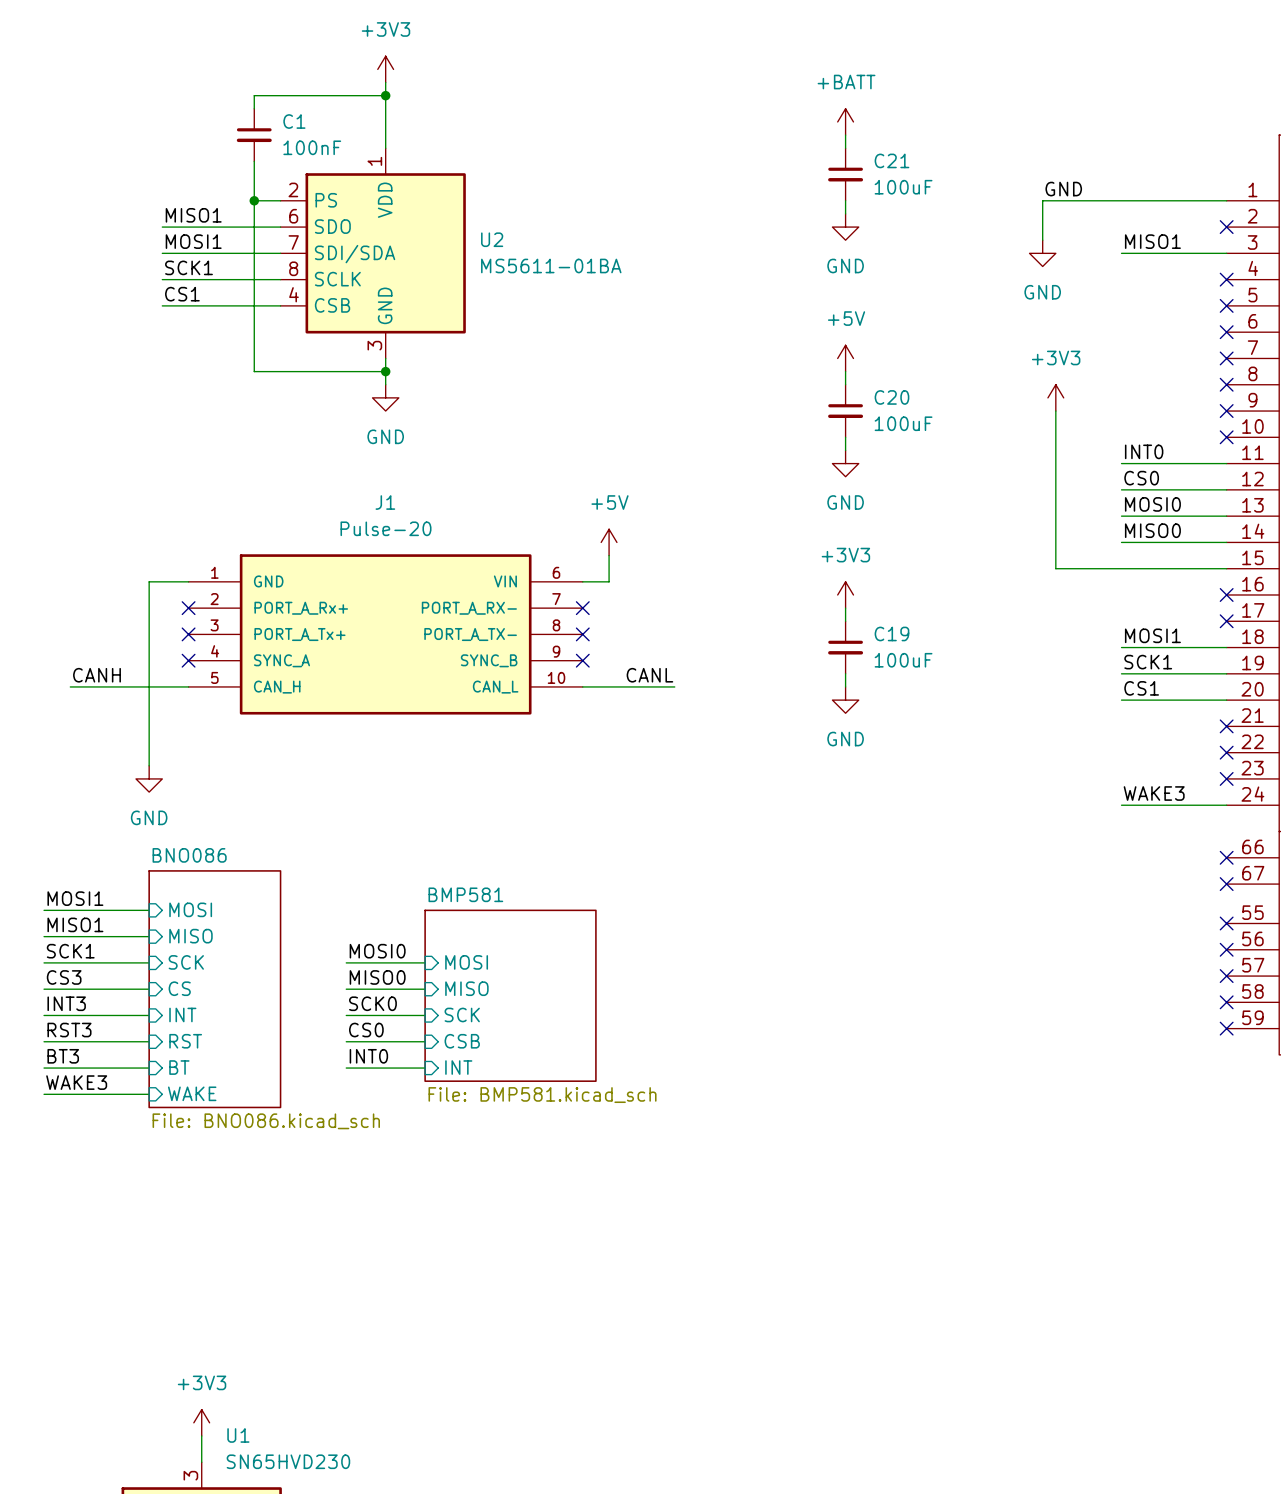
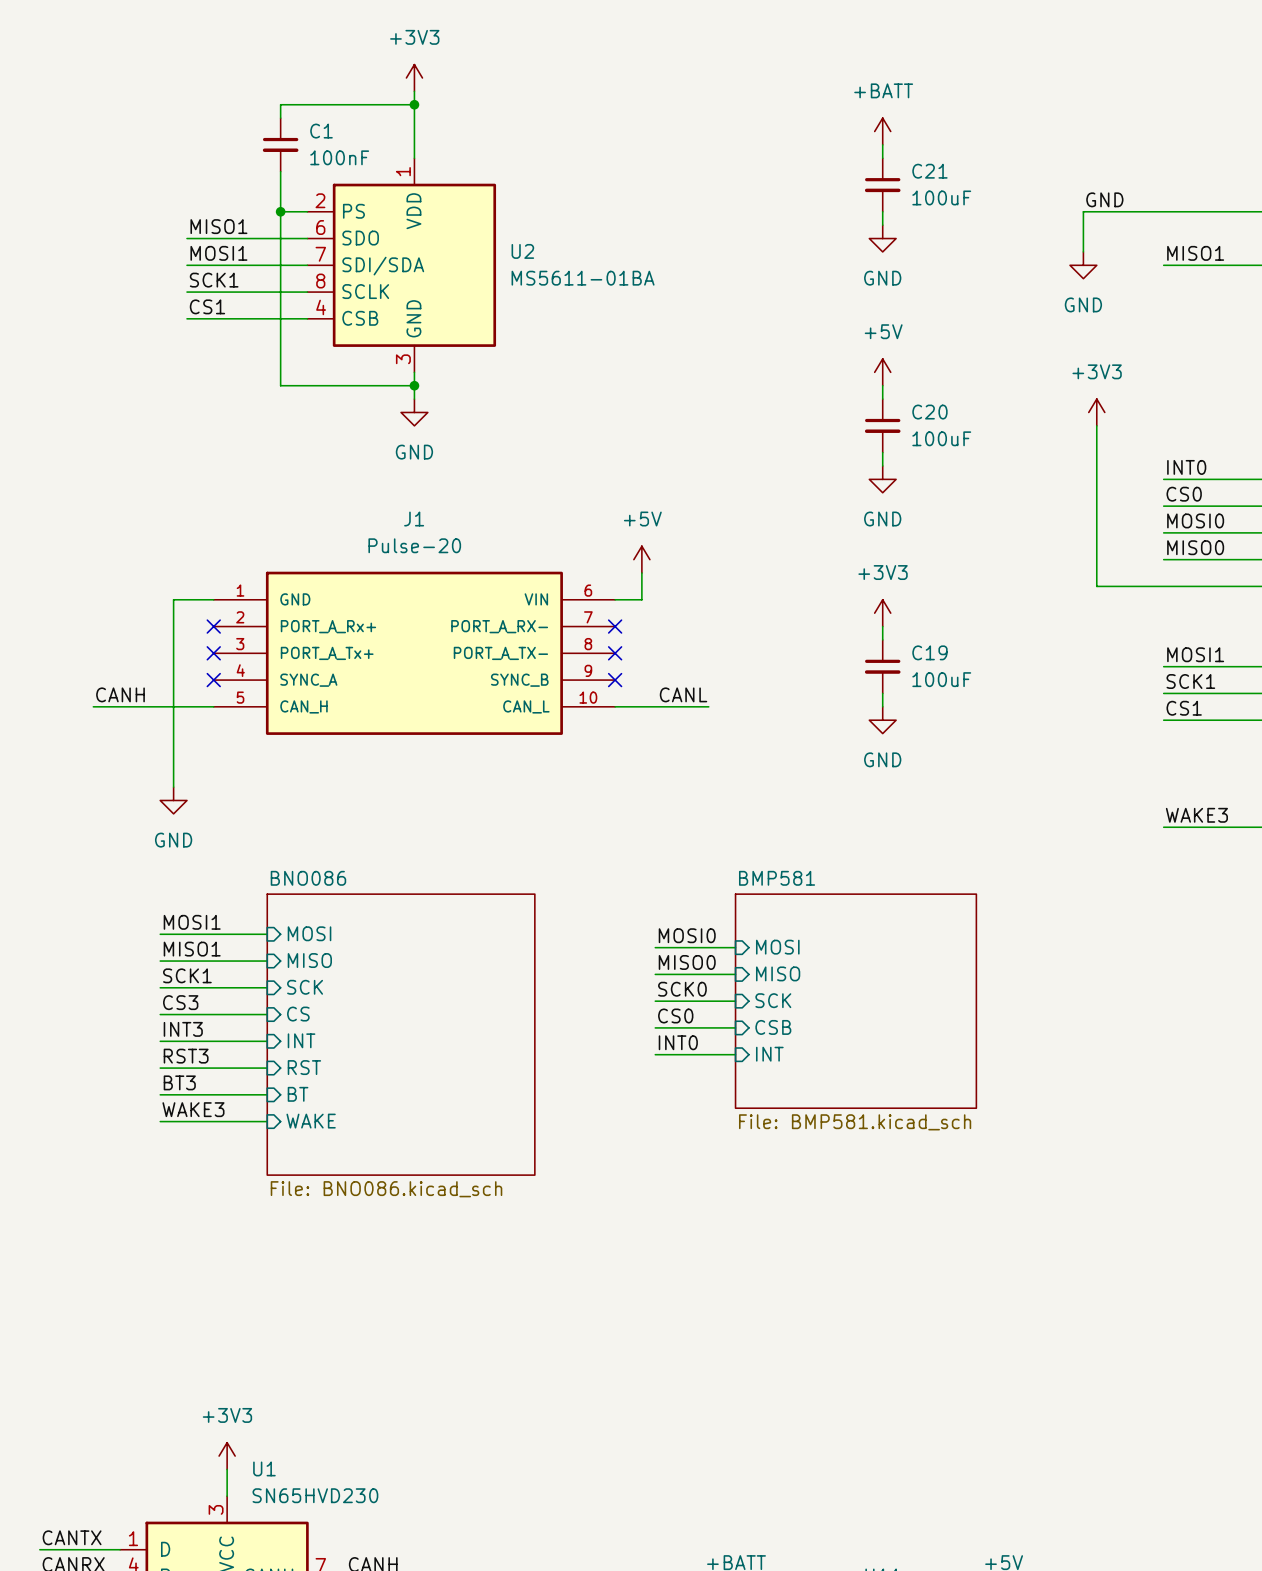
sheet BNO086 name position: BNO086 (189, 855) -> BNO086 (308, 878)
sheet BNO086 shape: [148, 870, 282, 1109] -> [266, 893, 536, 1176]
sheet BMP581 name position: BMP581 (465, 894) -> BMP581 (777, 878)
label position: MOSI1 (75, 898) -> MOSI1 (192, 922)
sheet pin position: MOSI (190, 909) -> MOSI (309, 933)
sheet BMP581 shape: [424, 909, 597, 1082] -> [734, 893, 978, 1110]
wire: (44, 910) (136, 910) -> (173, 934) (267, 934)
label: none -> MOSI0 (687, 935)
wire: none -> (655, 947) (735, 947)
sheet pin: none -> MOSI (777, 947)
label position: MISO1 (75, 924) -> MISO1 (192, 949)
wire: (44, 936) (136, 936) -> (173, 961) (267, 961)
sheet pin position: MISO (190, 936) -> MISO (309, 960)
label: none -> MISO0 (687, 962)
wire: none -> (655, 974) (735, 974)
sheet pin: none -> MISO (778, 973)
label position: SCK1 (70, 951) -> SCK1 (187, 975)
label: MOSI0 (377, 951) -> none
wire: (44, 962) (136, 962) -> (173, 987) (267, 987)
sheet pin position: SCK (186, 962) -> SCK (305, 987)
wire: (346, 962) (425, 962) -> none
sheet pin: MOSI (466, 962) -> none
label: none -> SCK0 (682, 989)
sheet pin: none -> SCK (773, 1000)
wire: none -> (655, 1001) (735, 1001)
label position: CS3 (64, 977) -> CS3 (180, 1002)
label: MISO0 (377, 977) -> none
sheet pin position: CS (179, 988) -> CS (298, 1014)
sheet pin: MISO (466, 988) -> none
wire: (44, 989) (136, 989) -> (173, 1014) (267, 1014)
wire: (346, 989) (425, 989) -> none
label: none -> CS0 (675, 1015)
sheet pin: none -> CSB (773, 1027)
wire: none -> (655, 1027) (735, 1027)
label position: INT3 (66, 1003) -> INT3 (183, 1029)
label: SCK0 (372, 1003) -> none
sheet pin position: INT (182, 1014) -> INT (301, 1040)
sheet pin: SCK (462, 1014) -> none
wire: (44, 1015) (136, 1015) -> (173, 1041) (267, 1041)
wire: (346, 1015) (425, 1015) -> none
label: none -> INT0 (678, 1042)
wire: none -> (655, 1054) (735, 1054)
sheet pin: none -> INT (769, 1054)
label position: RST3 (69, 1030) -> RST3 (186, 1056)
label: CS0 (366, 1030) -> none
wire: (44, 1041) (136, 1041) -> (173, 1068) (267, 1068)
sheet pin position: RST (185, 1041) -> RST (304, 1067)
wire: (346, 1041) (425, 1041) -> none
sheet pin: CSB (462, 1041) -> none
label position: BT3 (63, 1056) -> BT3 (179, 1082)
label: INT0 (368, 1056) -> none
sheet pin position: BT (179, 1067) -> BT (298, 1094)
sheet pin: INT (458, 1067) -> none
wire: (44, 1068) (136, 1068) -> (173, 1094) (267, 1094)
wire: (346, 1068) (425, 1068) -> none
label position: WAKE3 (76, 1082) -> WAKE3 (193, 1109)
sheet pin position: WAKE (192, 1093) -> WAKE (311, 1121)
wire: (44, 1094) (136, 1094) -> (173, 1121) (267, 1121)
sheet BMP581 value position: File: BMP581.kicad_sch (542, 1095) -> File: BMP581.kicad_sch (855, 1122)
sheet BNO086 value position: File: BNO086.kicad_sch (266, 1121) -> File: BNO086.kicad_sch (386, 1189)

